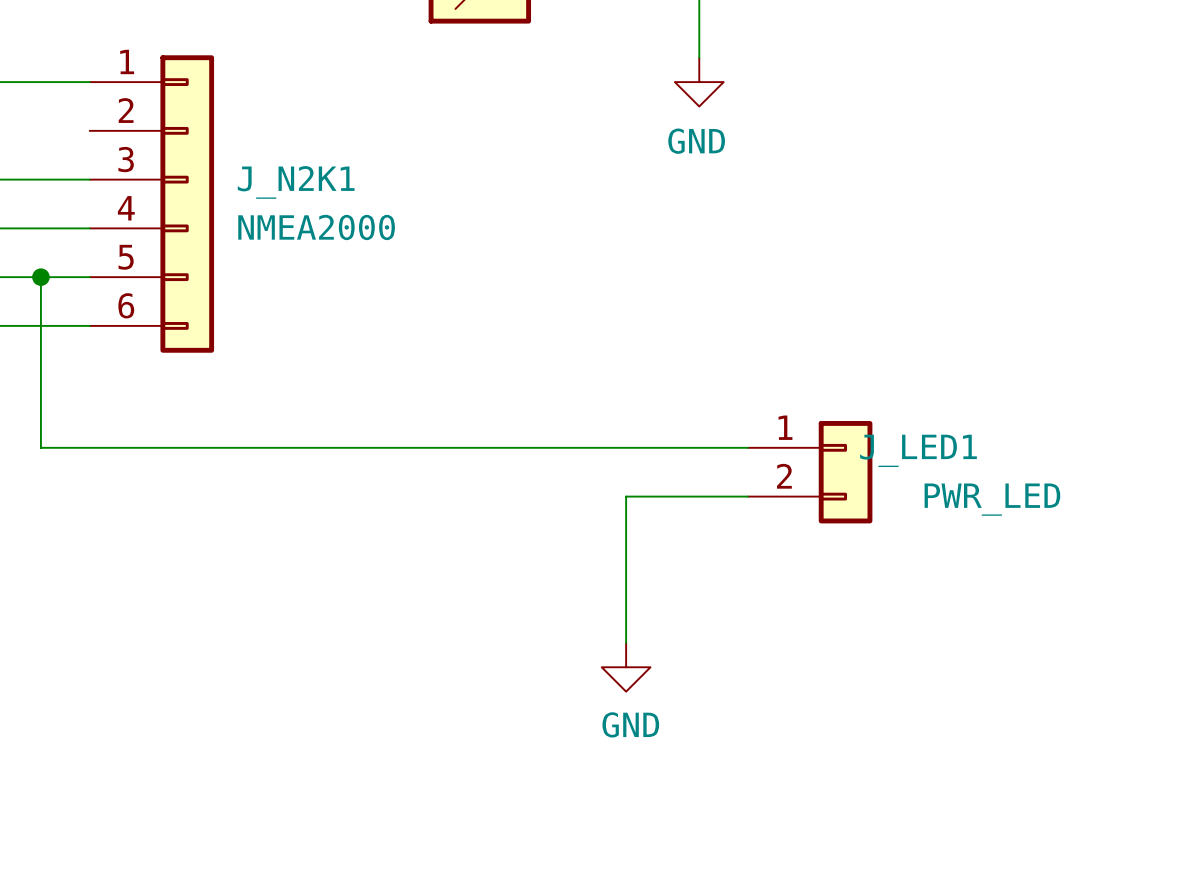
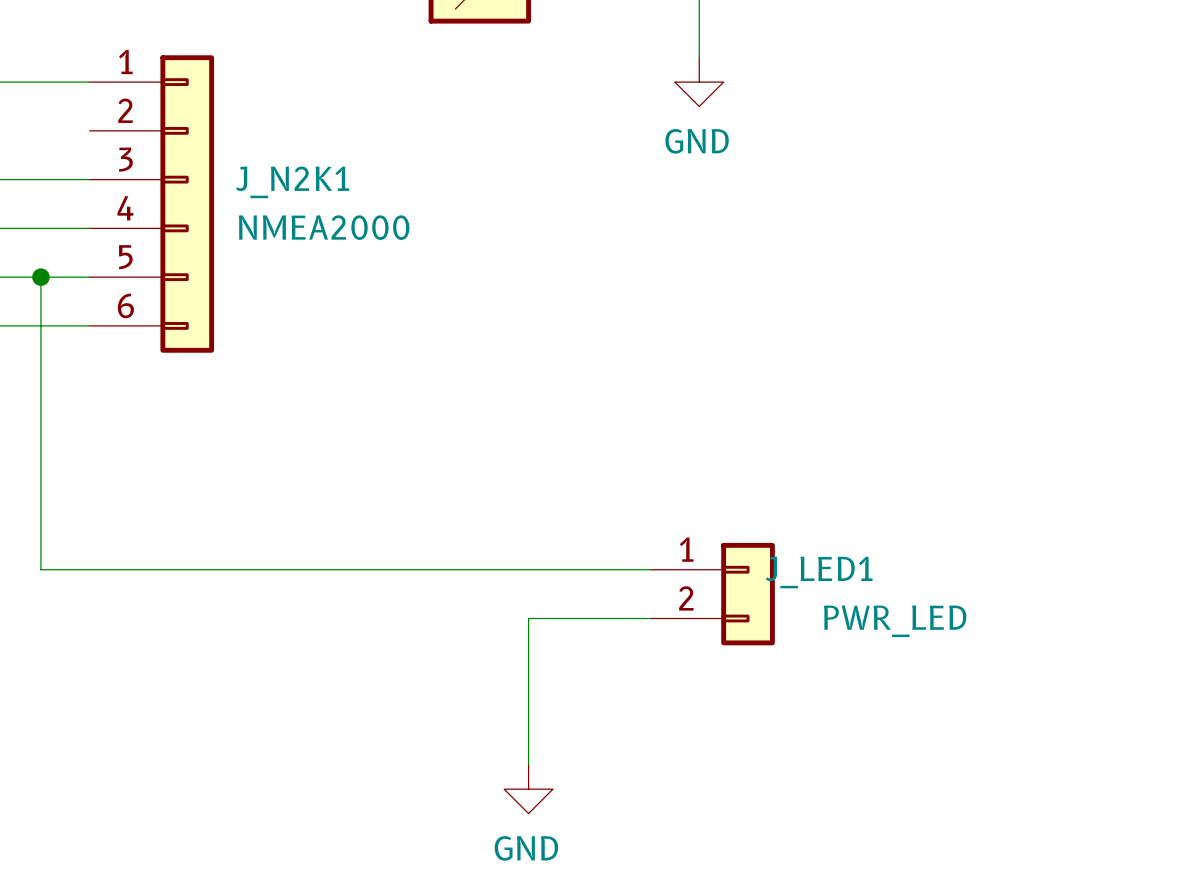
wire: (40, 447) (748, 447) -> (40, 447) (40, 569) (650, 569)
J_LED1 position: (810, 472) -> (712, 594)
wire: (748, 496) (626, 496) (626, 642) -> (650, 618) (528, 618) (528, 764)
power symbol position: GND (626, 667) -> GND (528, 789)
power symbol text position: GND (630, 724) -> GND (526, 848)

